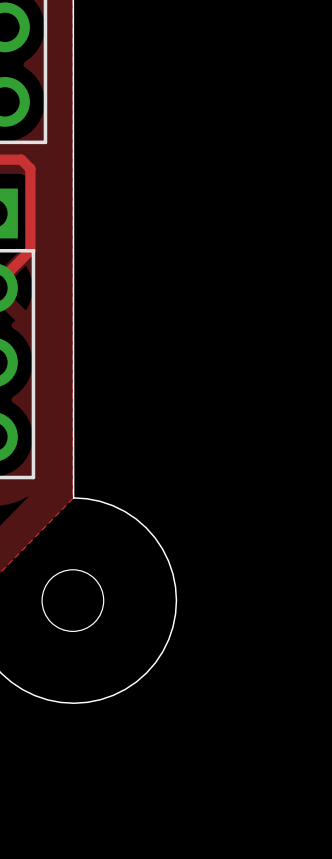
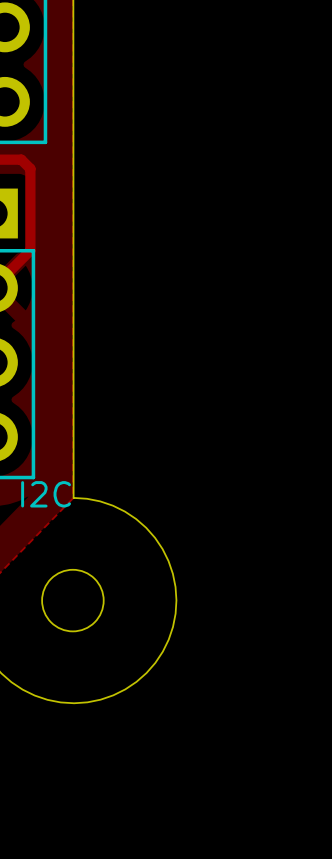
text: none -> I2C (46, 494)

